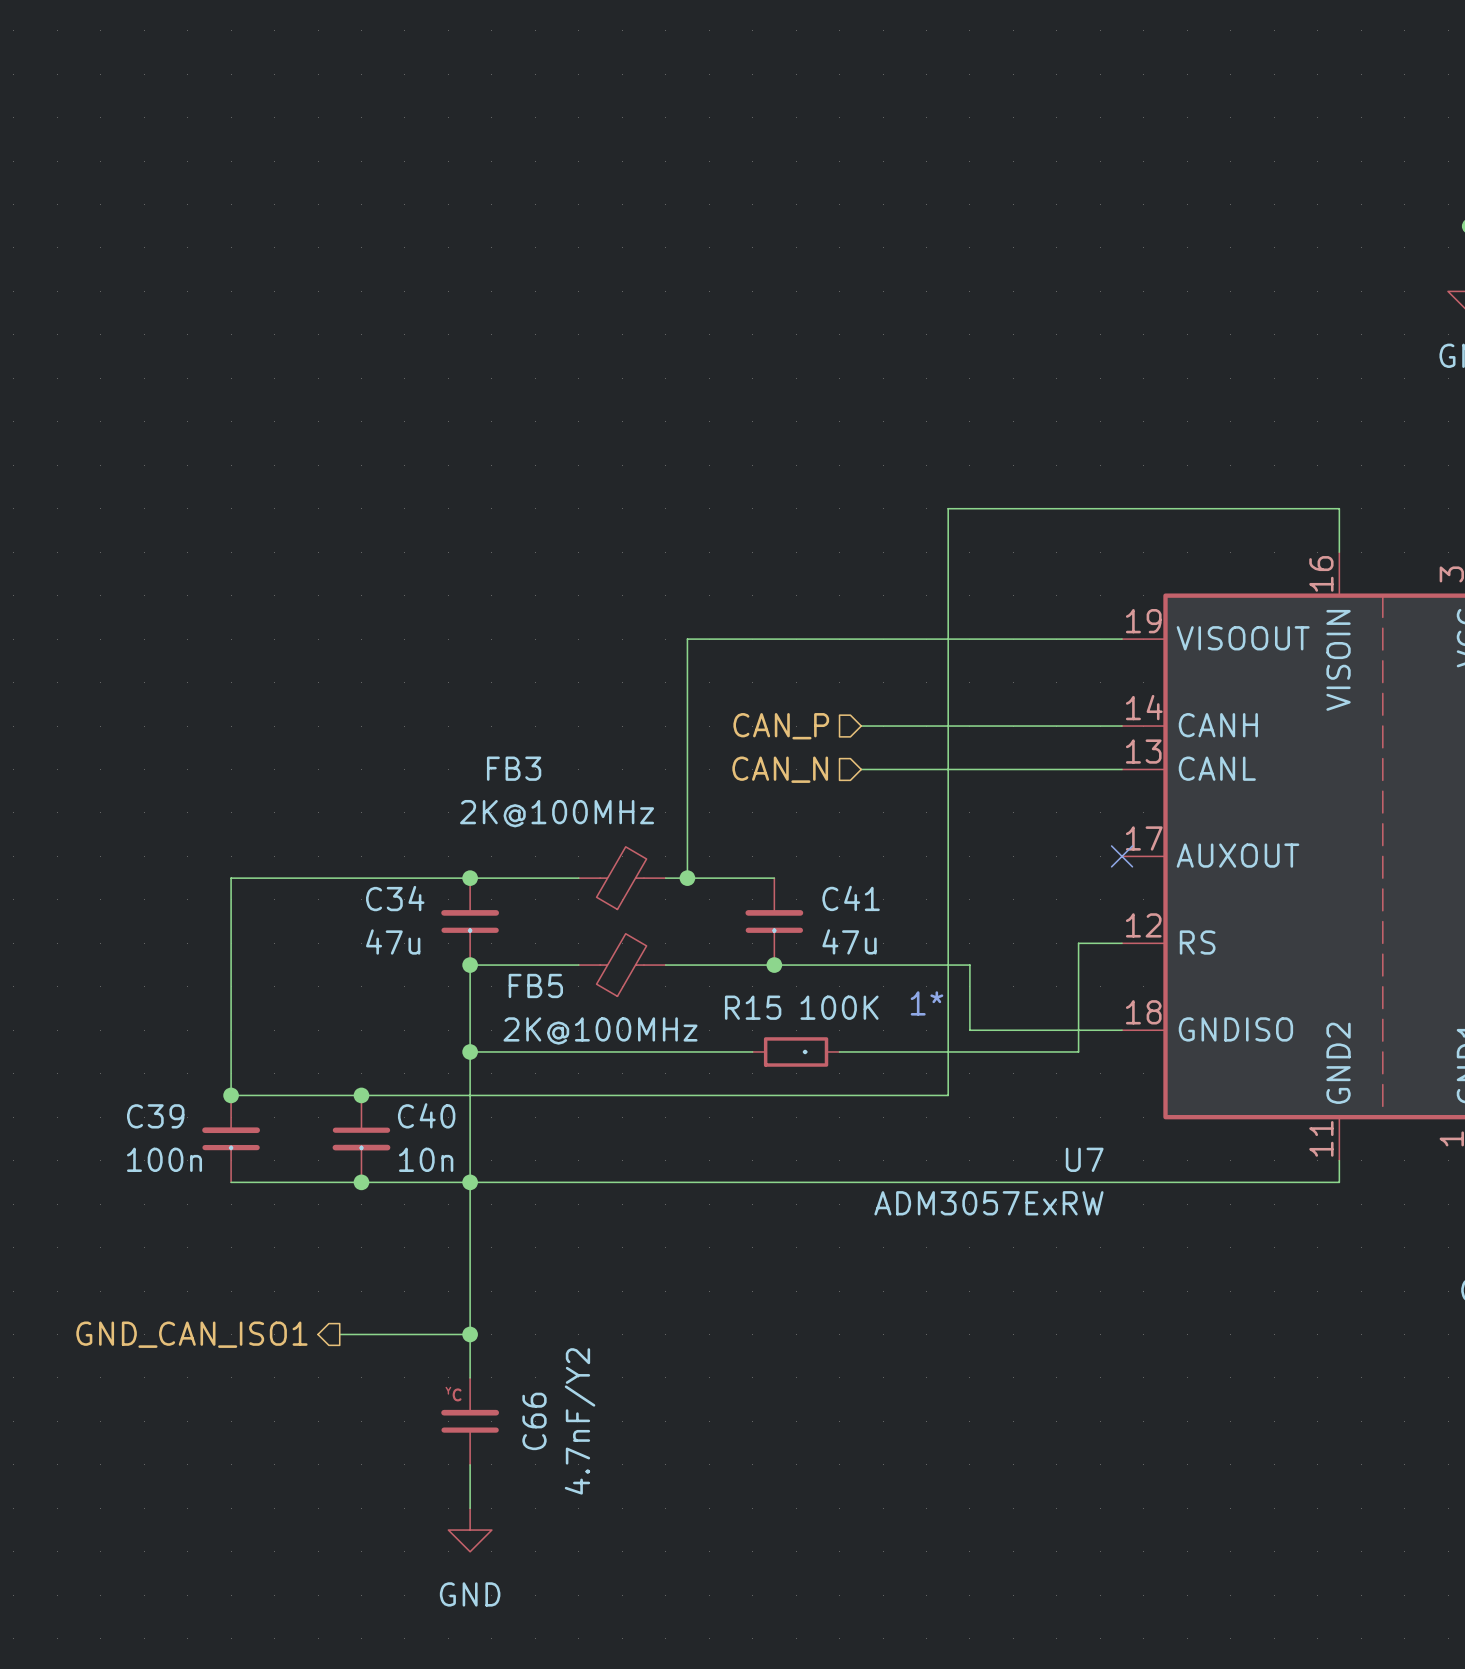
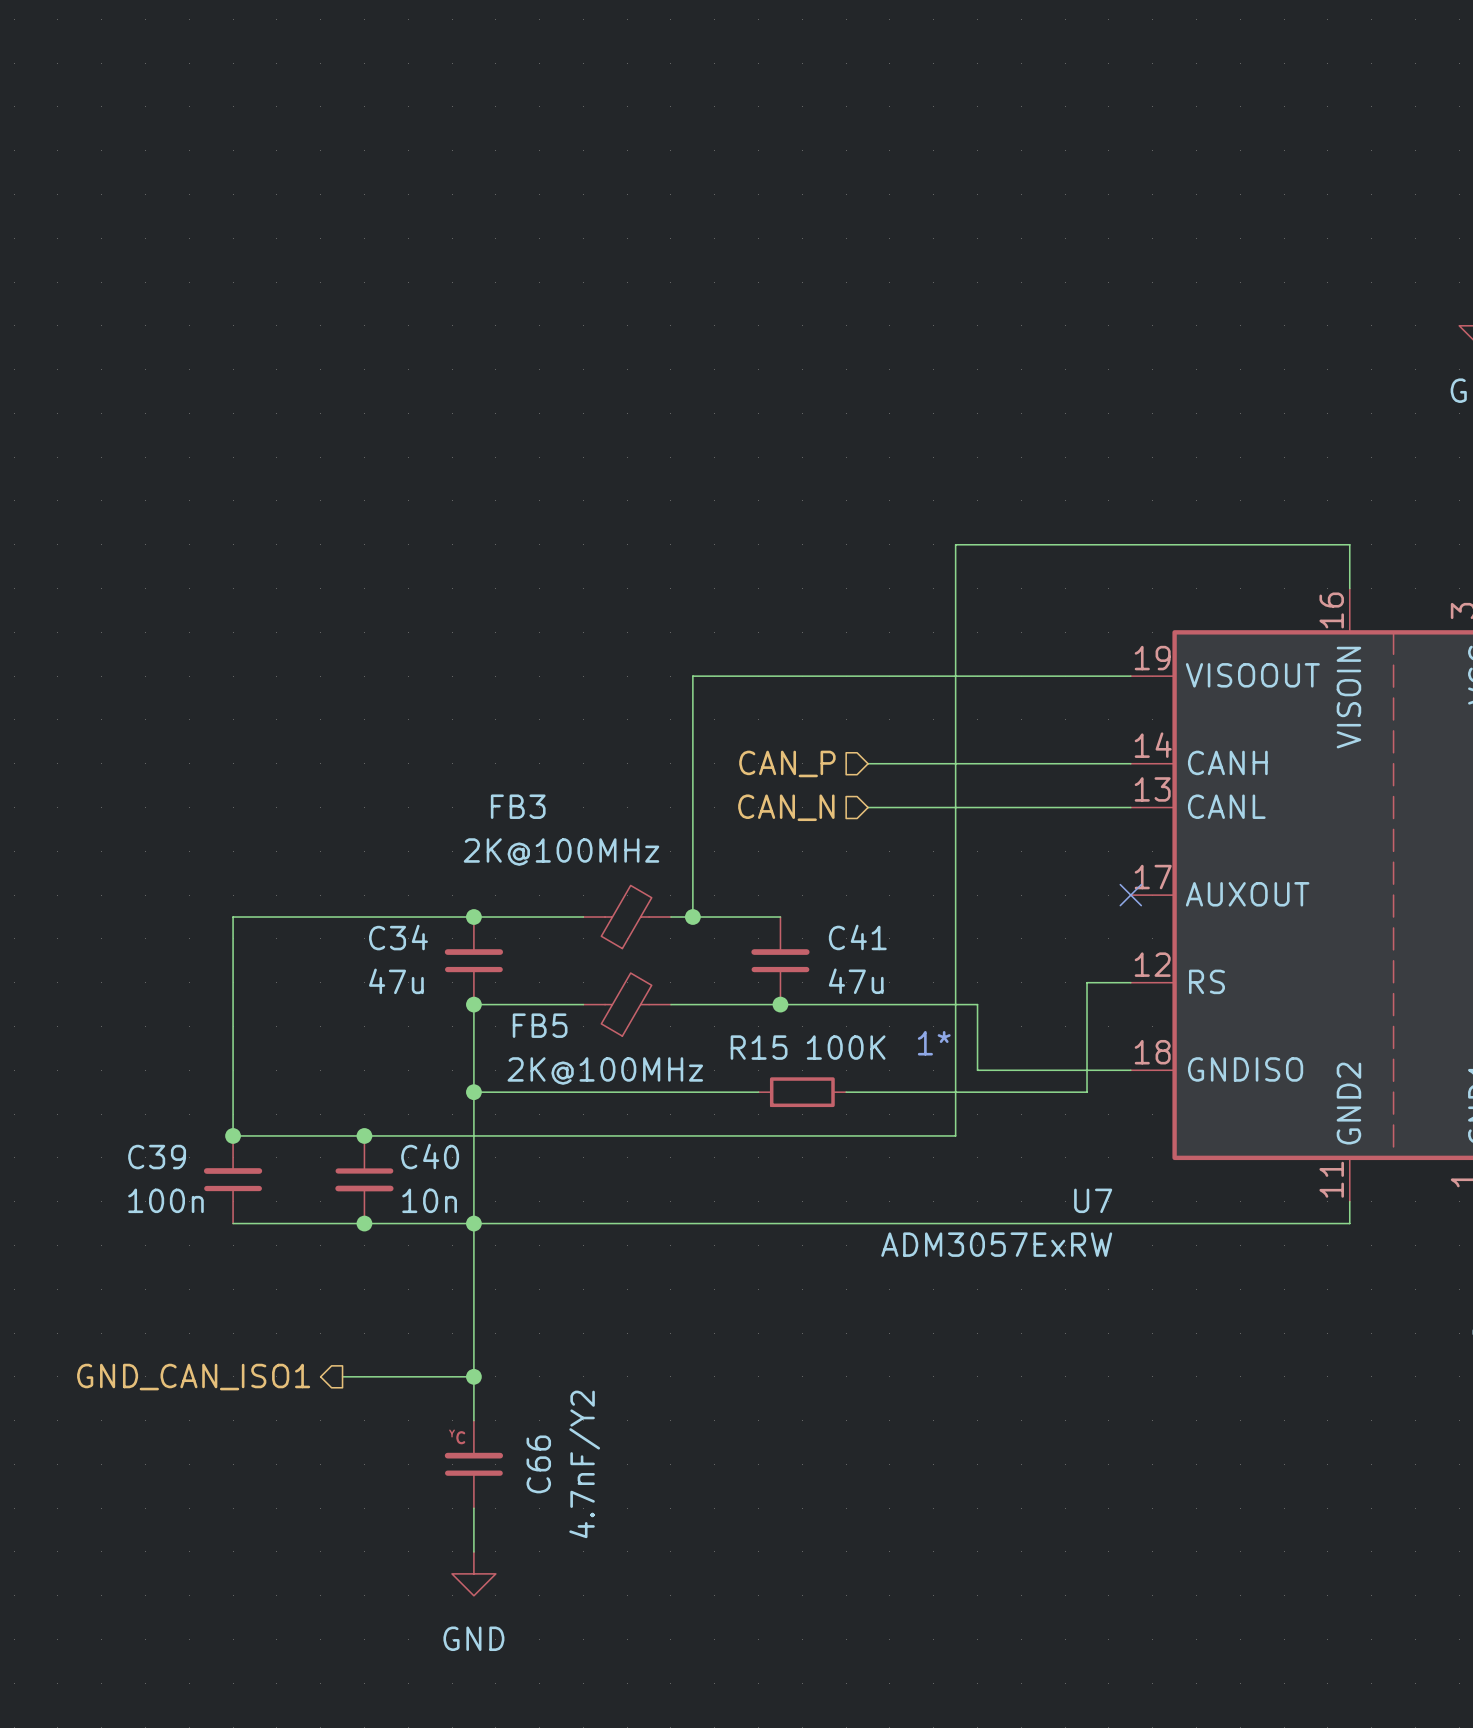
C34 text: . (470, 930) -> none
C41 text: . (774, 930) -> none
R15 text: . (805, 1051) -> none
C39 text: . (231, 1147) -> none
C40 text: . (361, 1147) -> none

